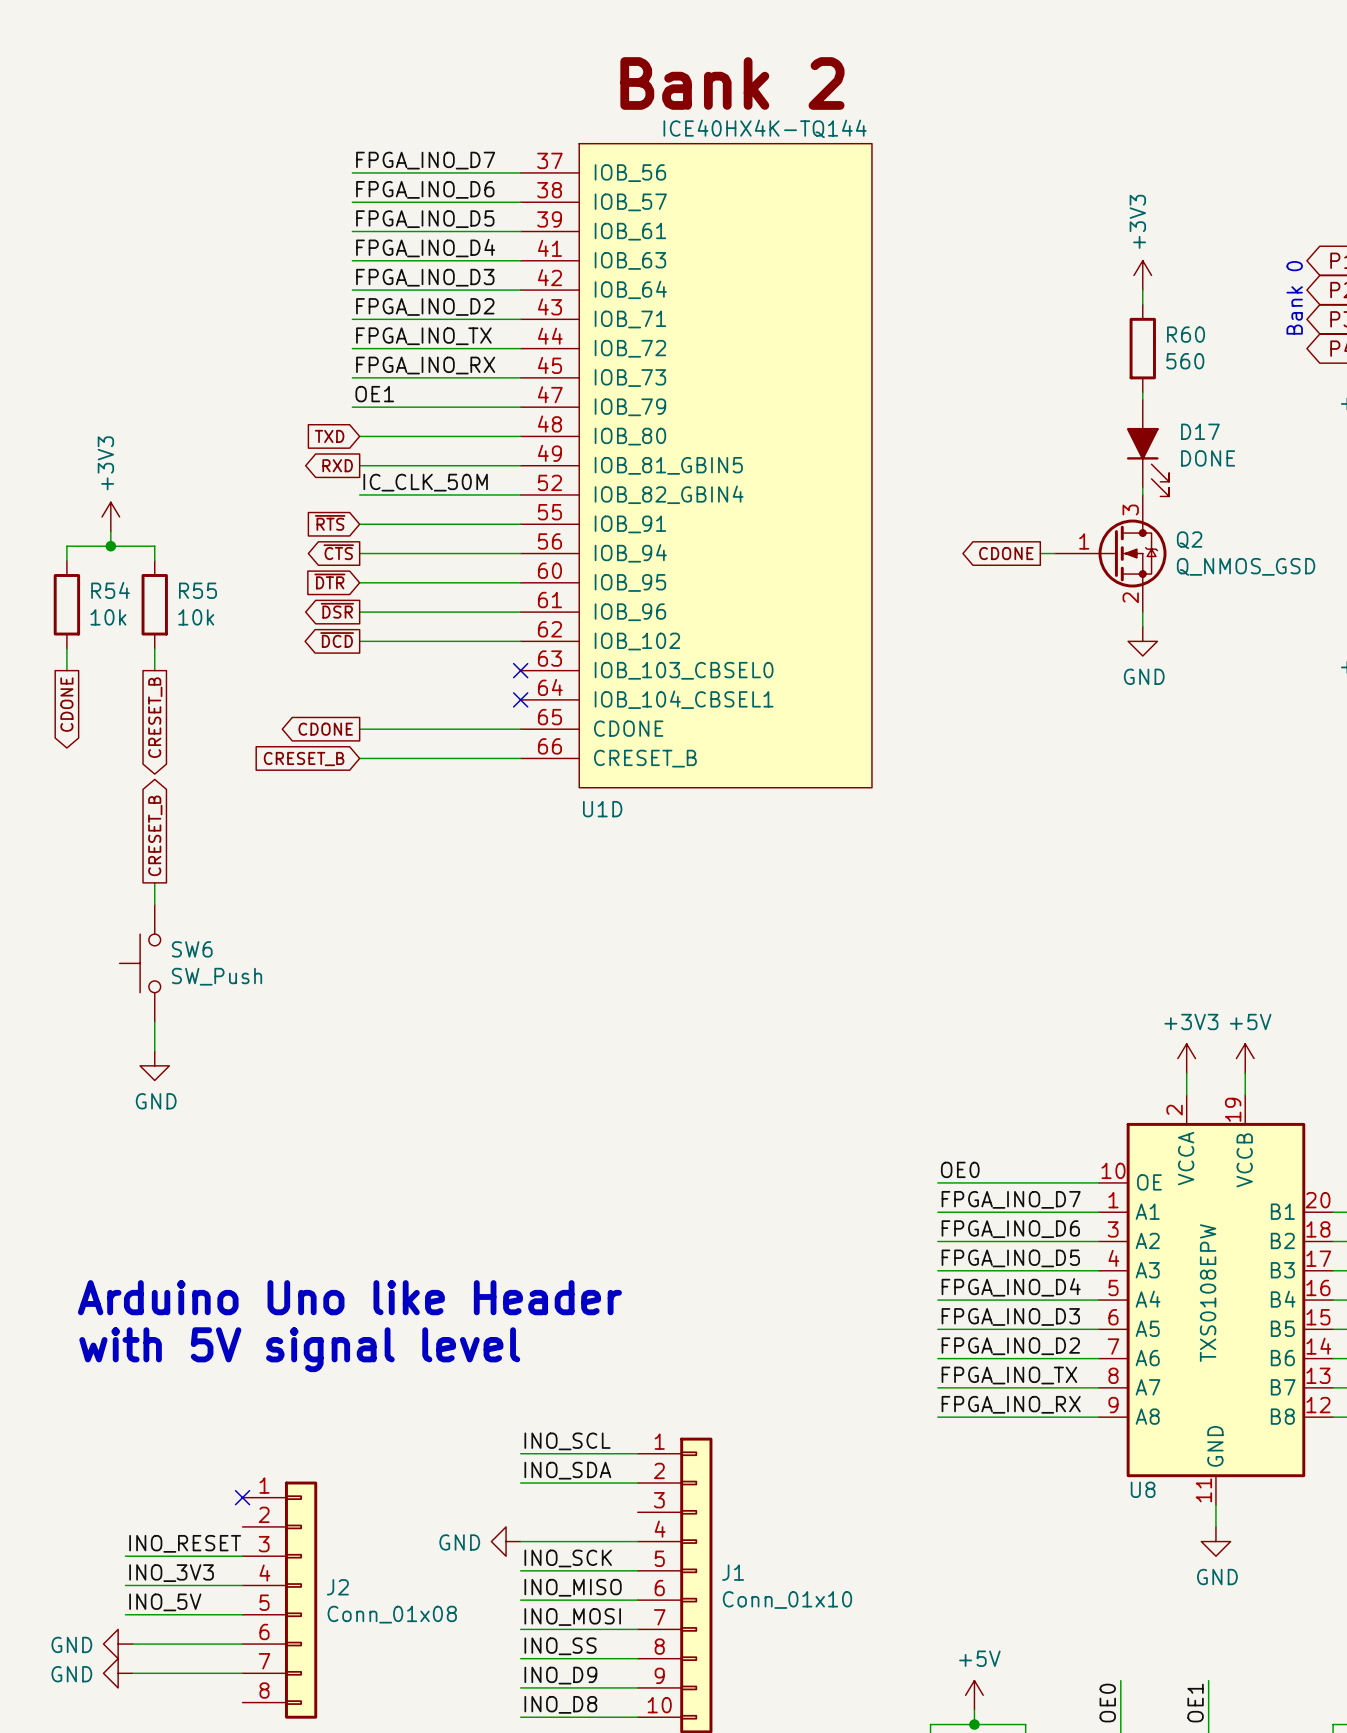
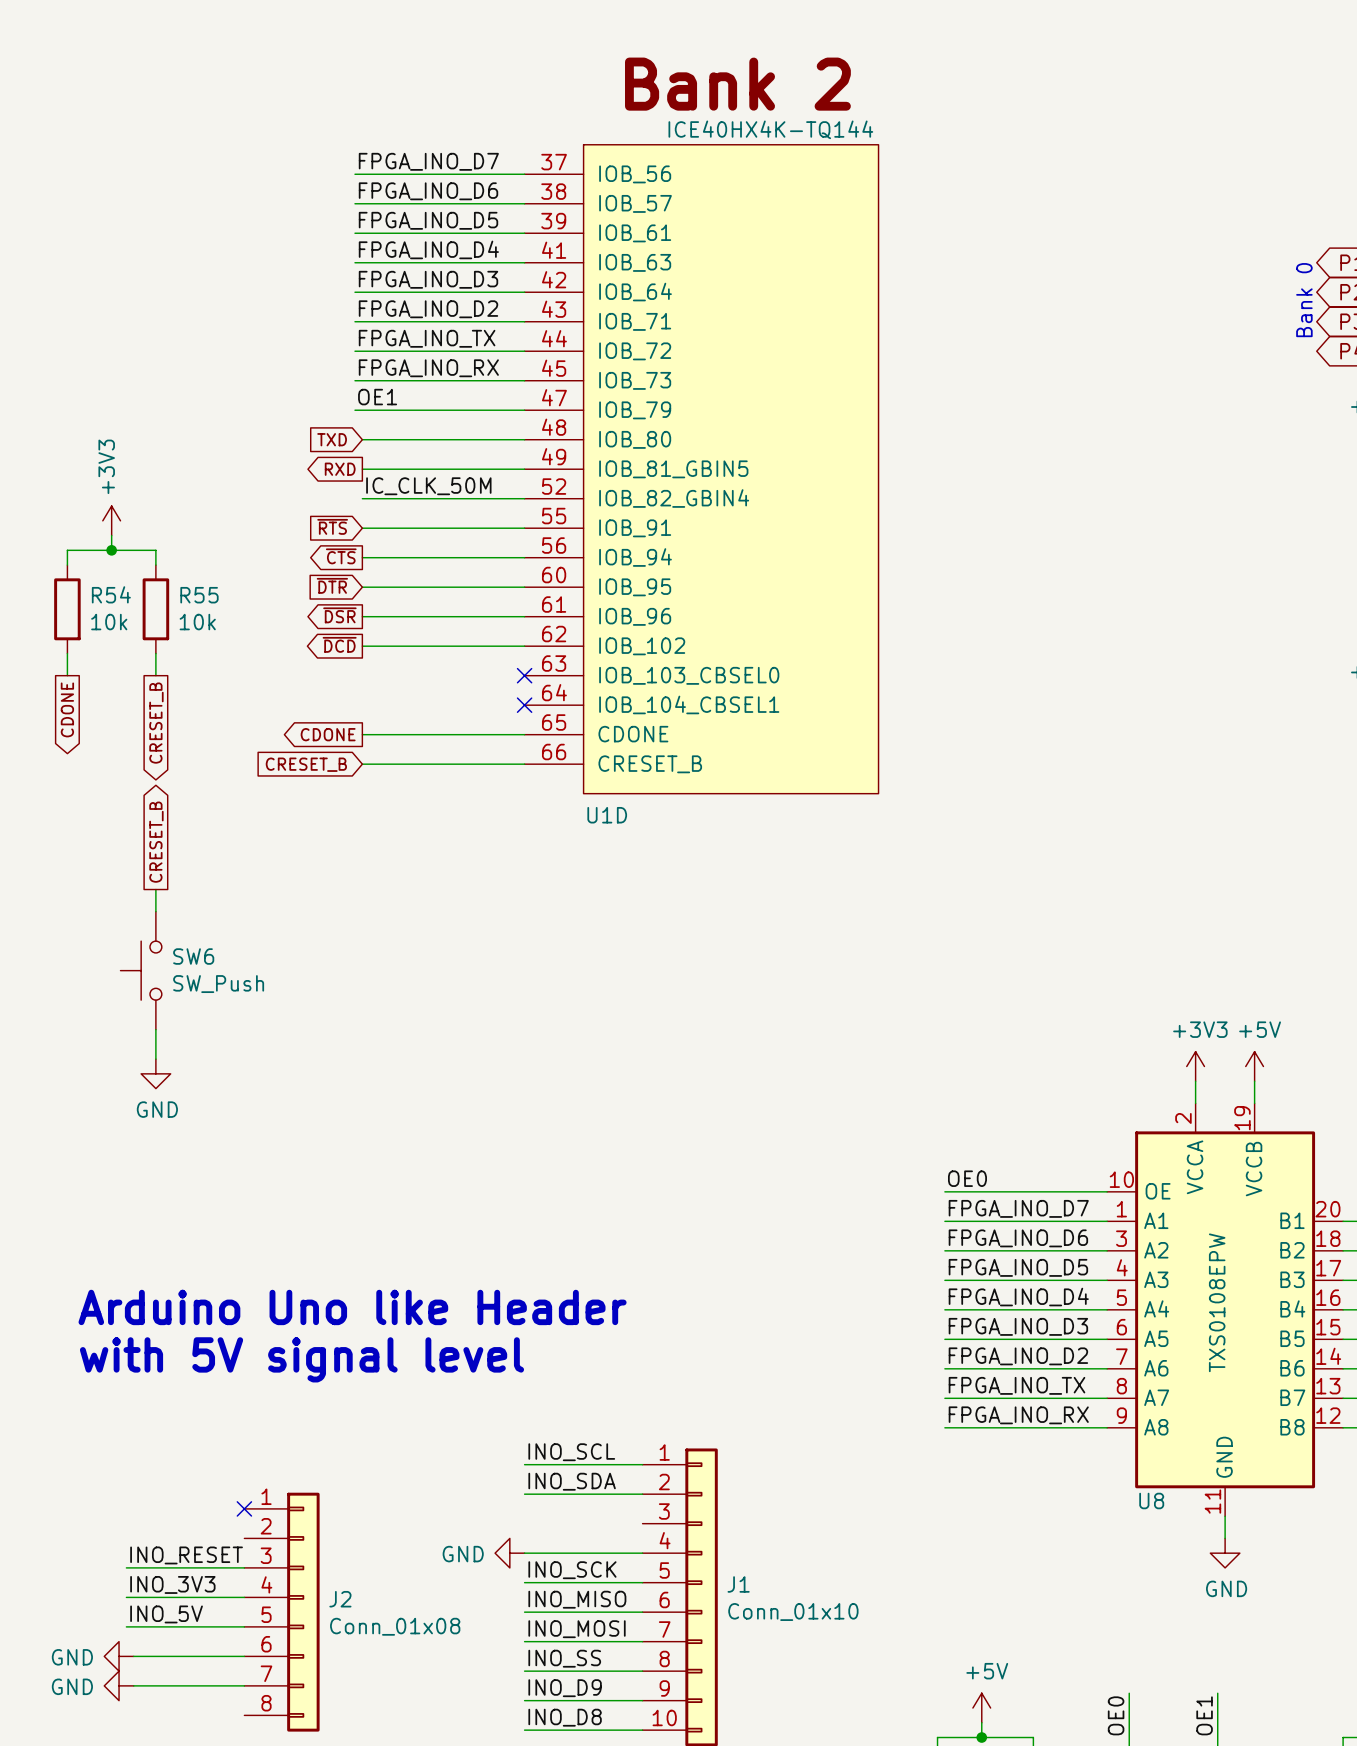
power symbol: +3V3 (1142, 275) -> none
wire: (1142, 290) (1142, 304) -> none
R60: 560 (1142, 348) -> none
wire: (1142, 392) (1142, 399) -> none
D17: DONE (1148, 448) -> none
wire: (1142, 487) (1142, 494) -> none
global label: CDONE (1006, 553) -> none
wire: (1040, 553) (1054, 553) -> none
Q2: Q_NMOS_GSD (1110, 553) -> none
wire: (1142, 612) (1142, 626) -> none
power symbol: GND (1142, 641) -> none

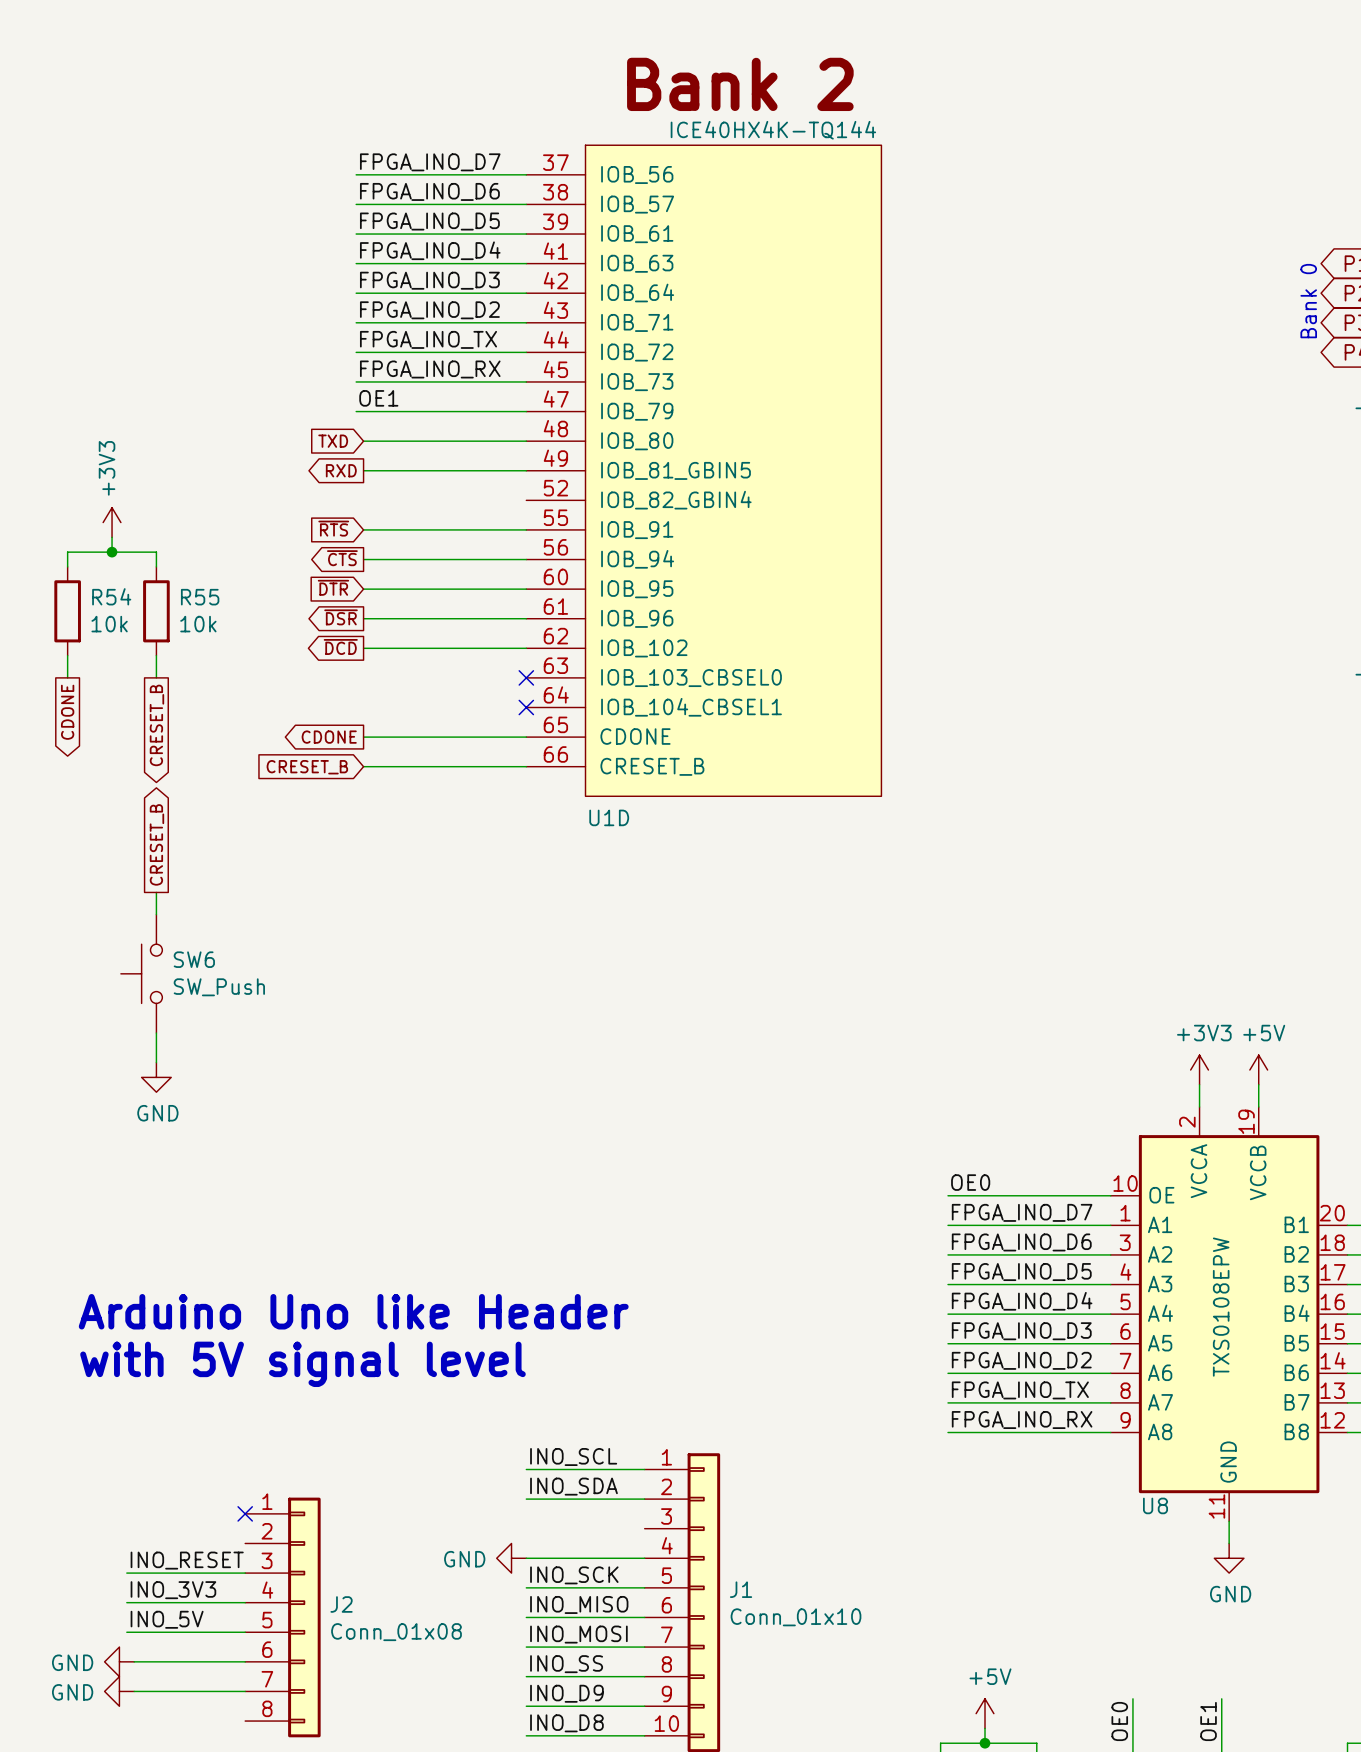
label: IC_CLK_50M (428, 486) -> none
wire: (362, 498) (524, 498) -> none

